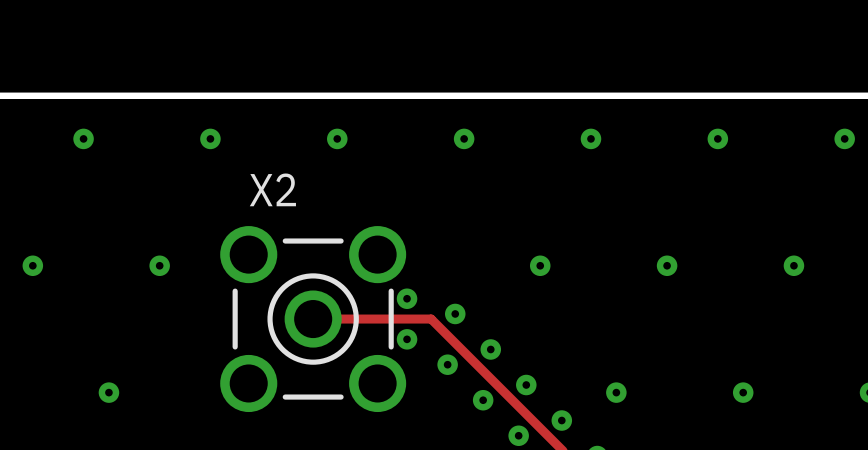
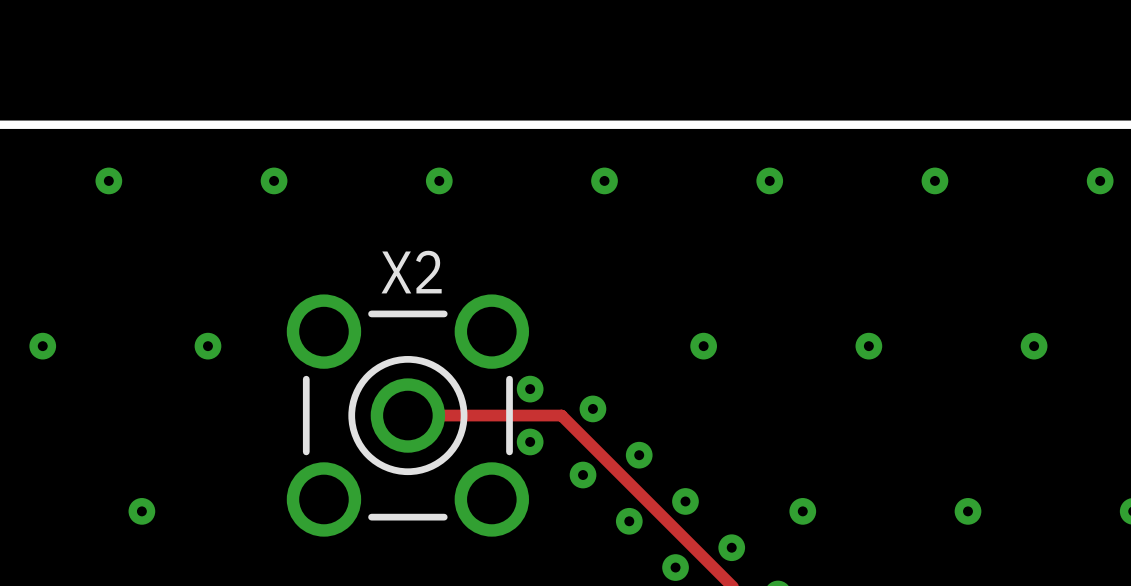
X2 name position: X2 (272, 189) -> X2 (411, 272)

